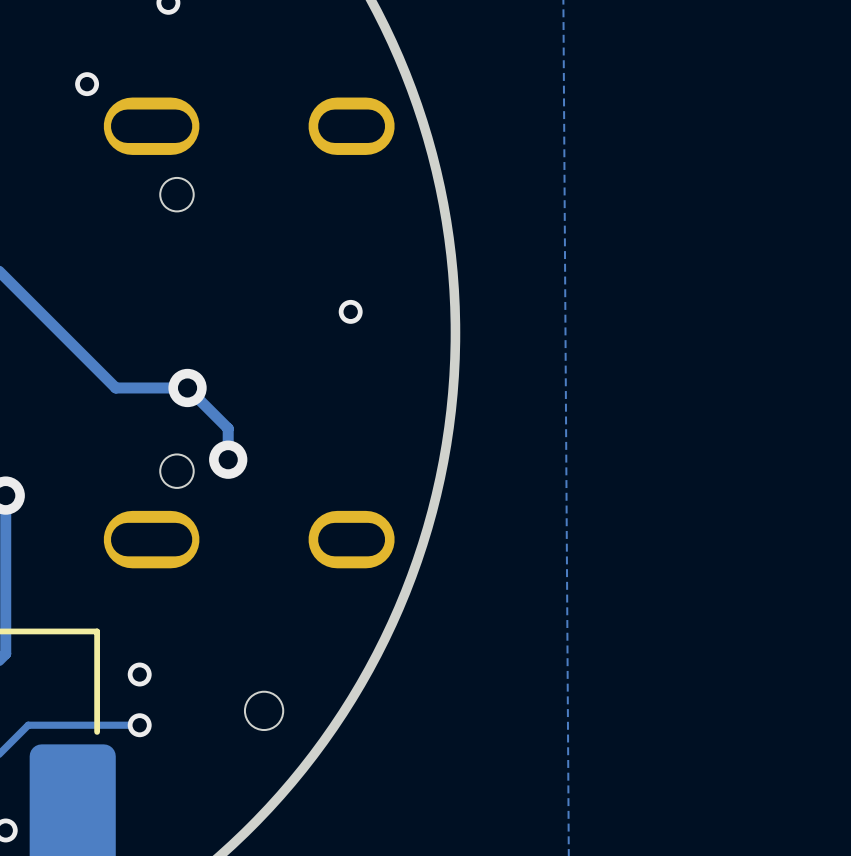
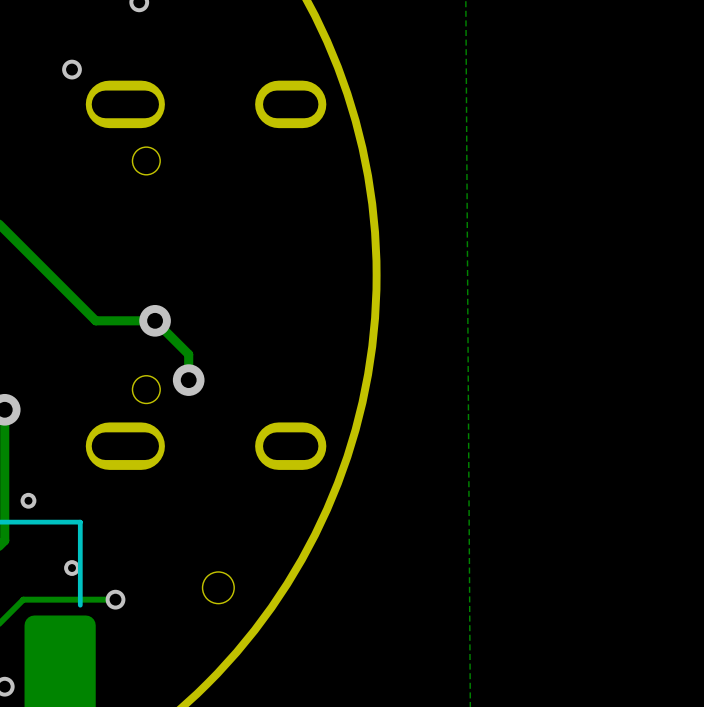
via: (350, 311) -> none
via: none -> (28, 500)
via: (139, 674) -> none
via: none -> (72, 568)

